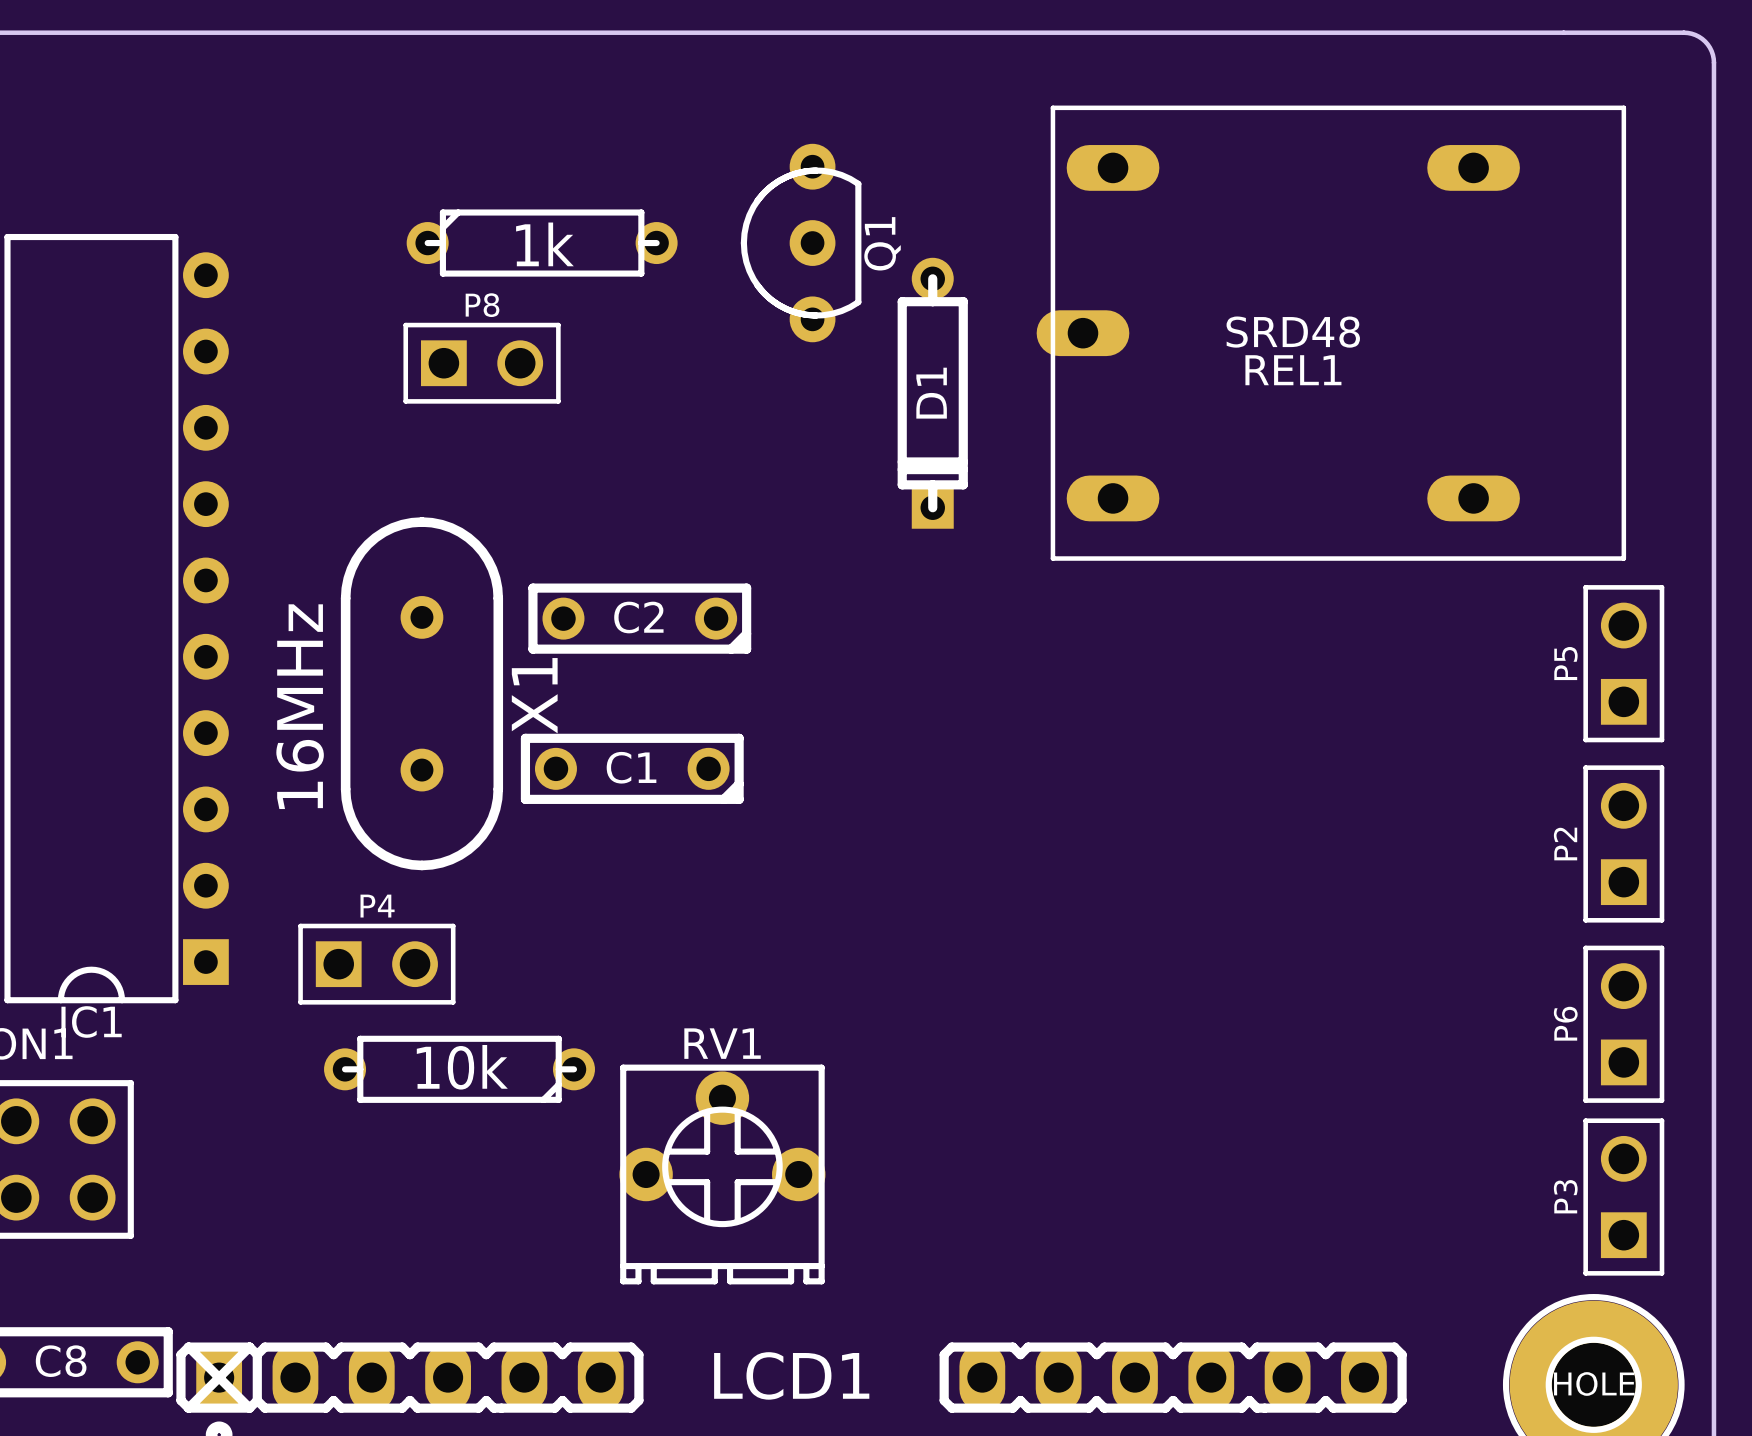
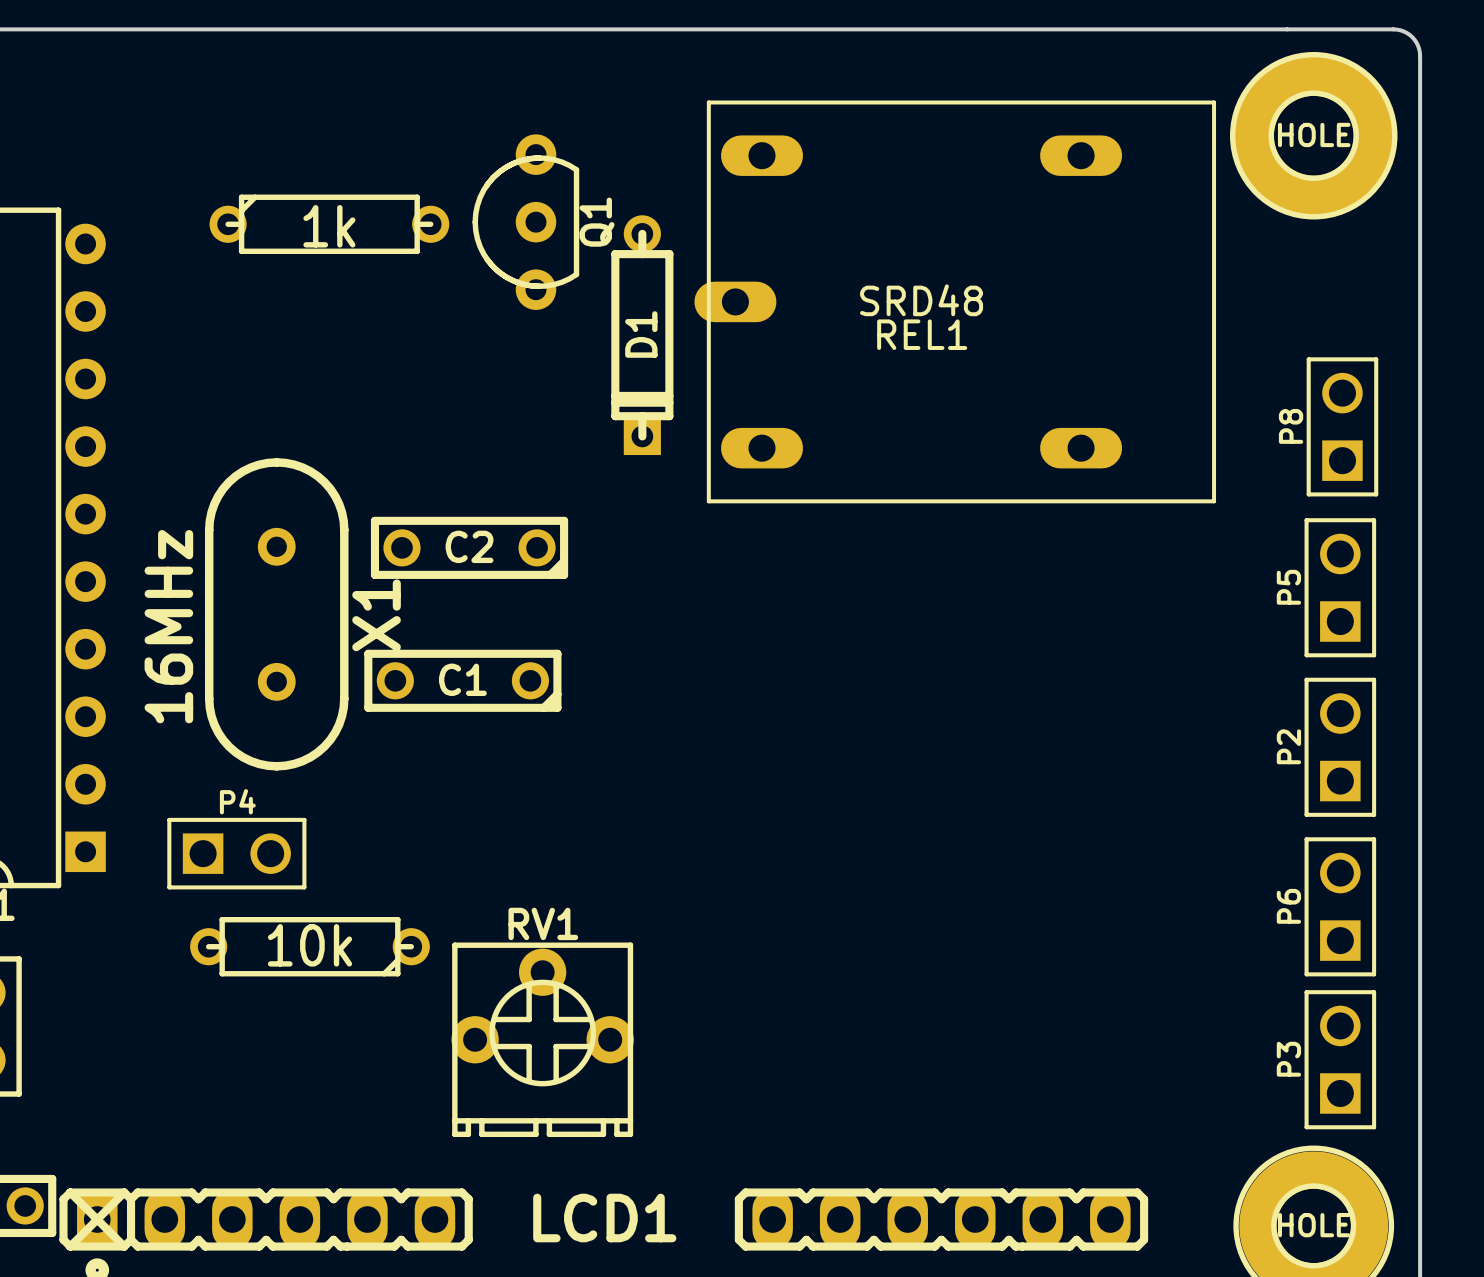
HOLE: none -> (1313, 135)
part position: (542, 243) -> (329, 224)
Q1 position: (801, 243) -> (525, 222)
REL1 position: (1331, 333) -> (955, 301)
P8 rotation: 0° (482, 363) -> 90° counterclockwise (1342, 426)
P8 position: (482, 363) -> (1342, 426)
D1 position: (932, 393) -> (642, 335)

